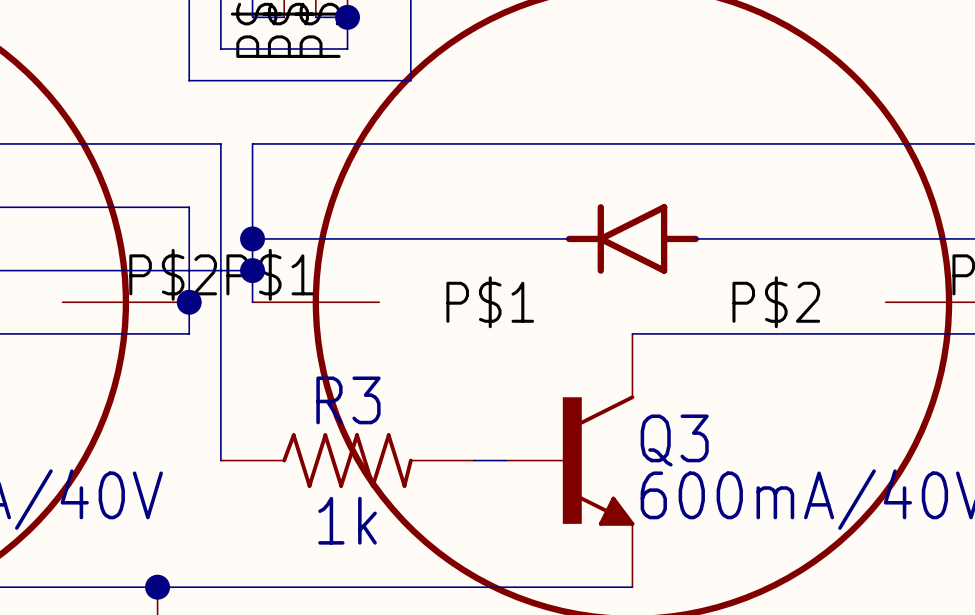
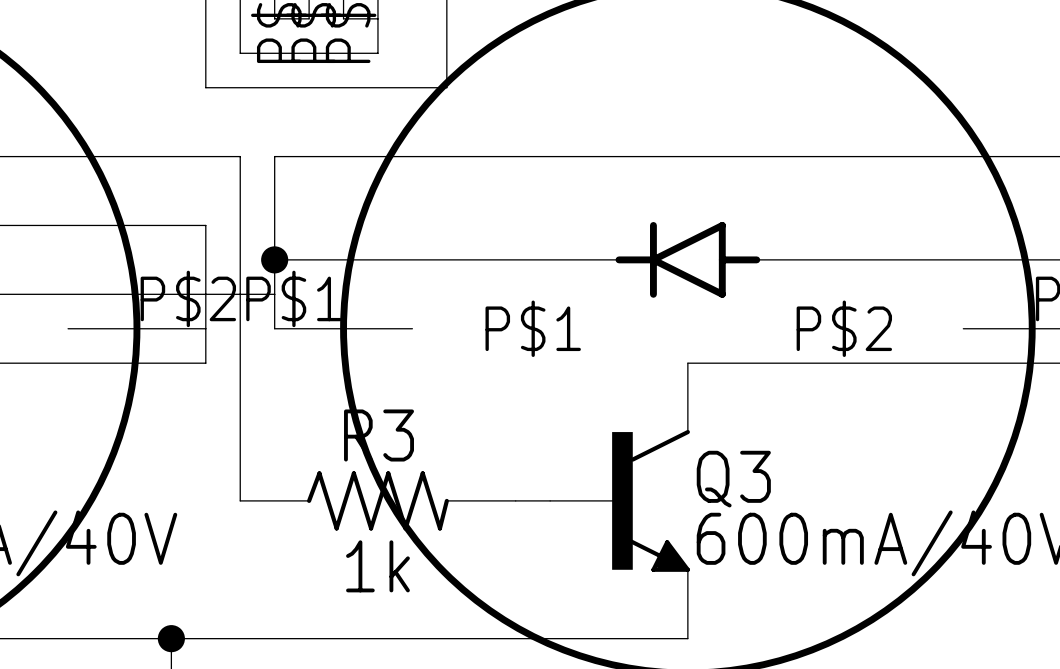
junction: (347, 17) -> none
junction: (252, 270) -> none
junction: (189, 302) -> none

